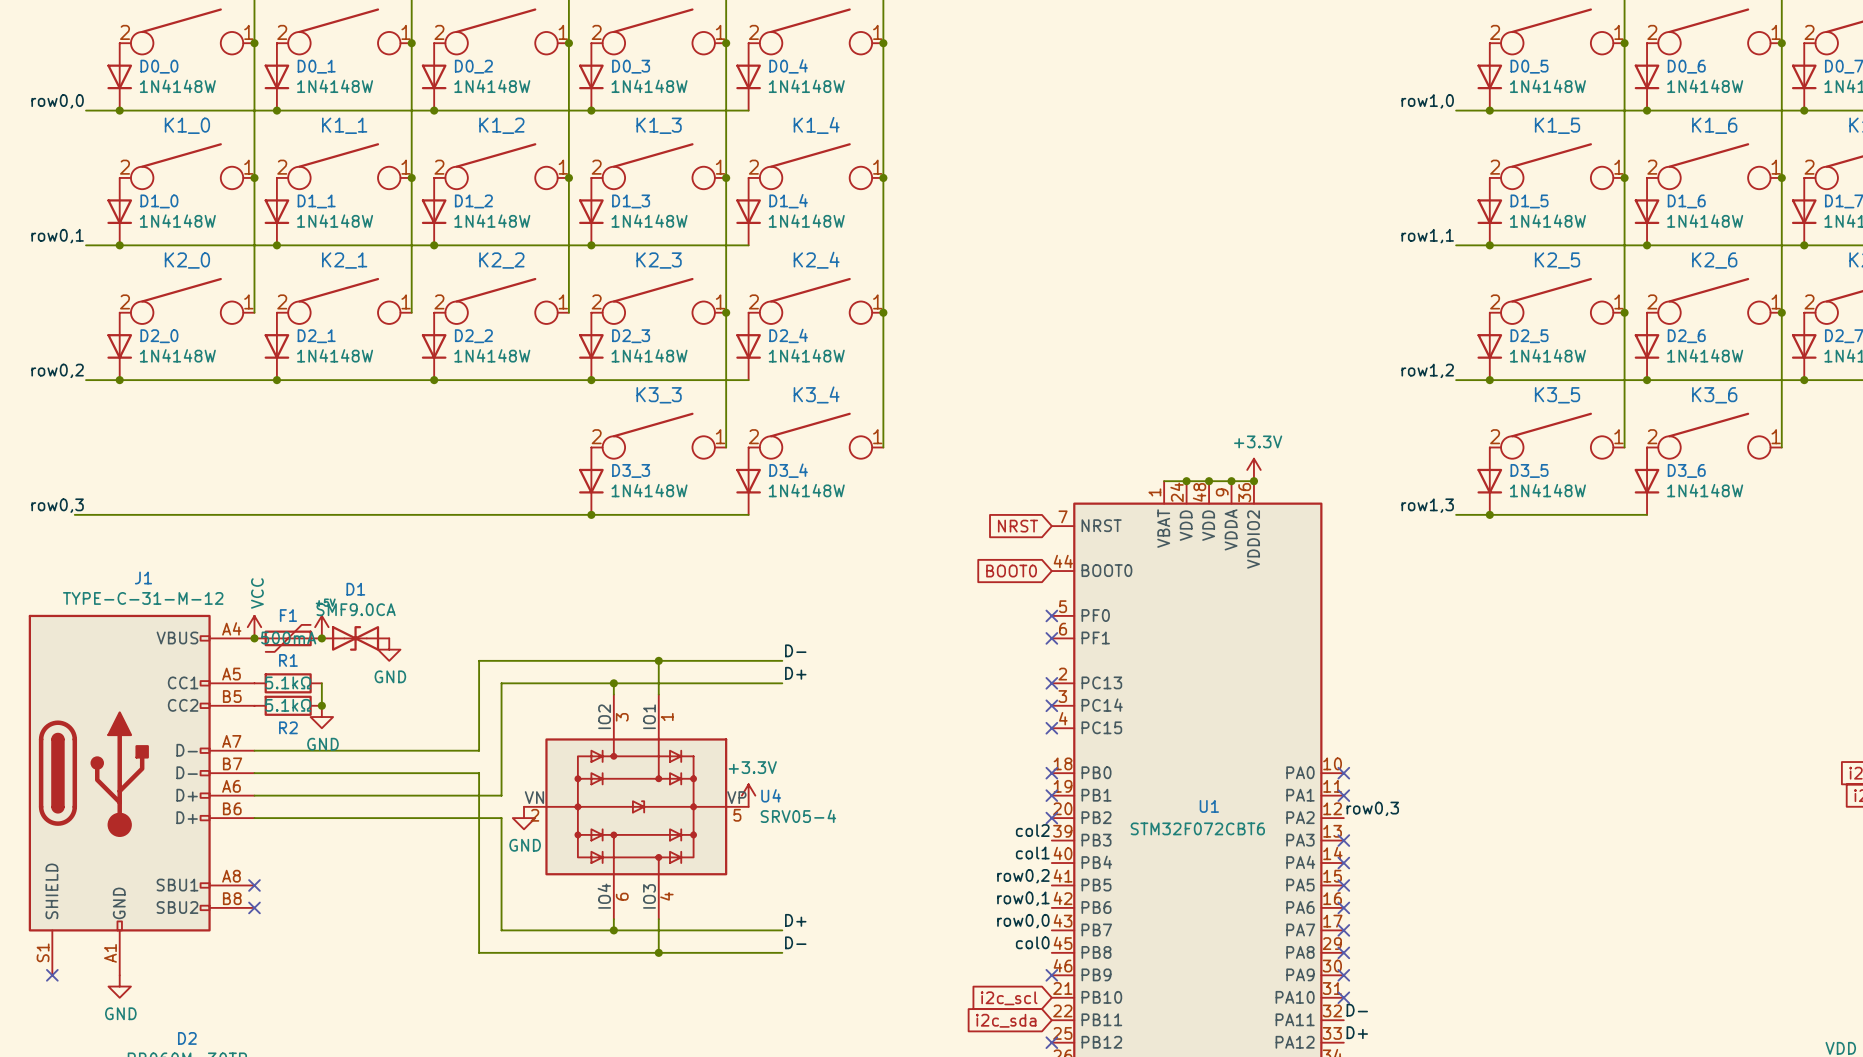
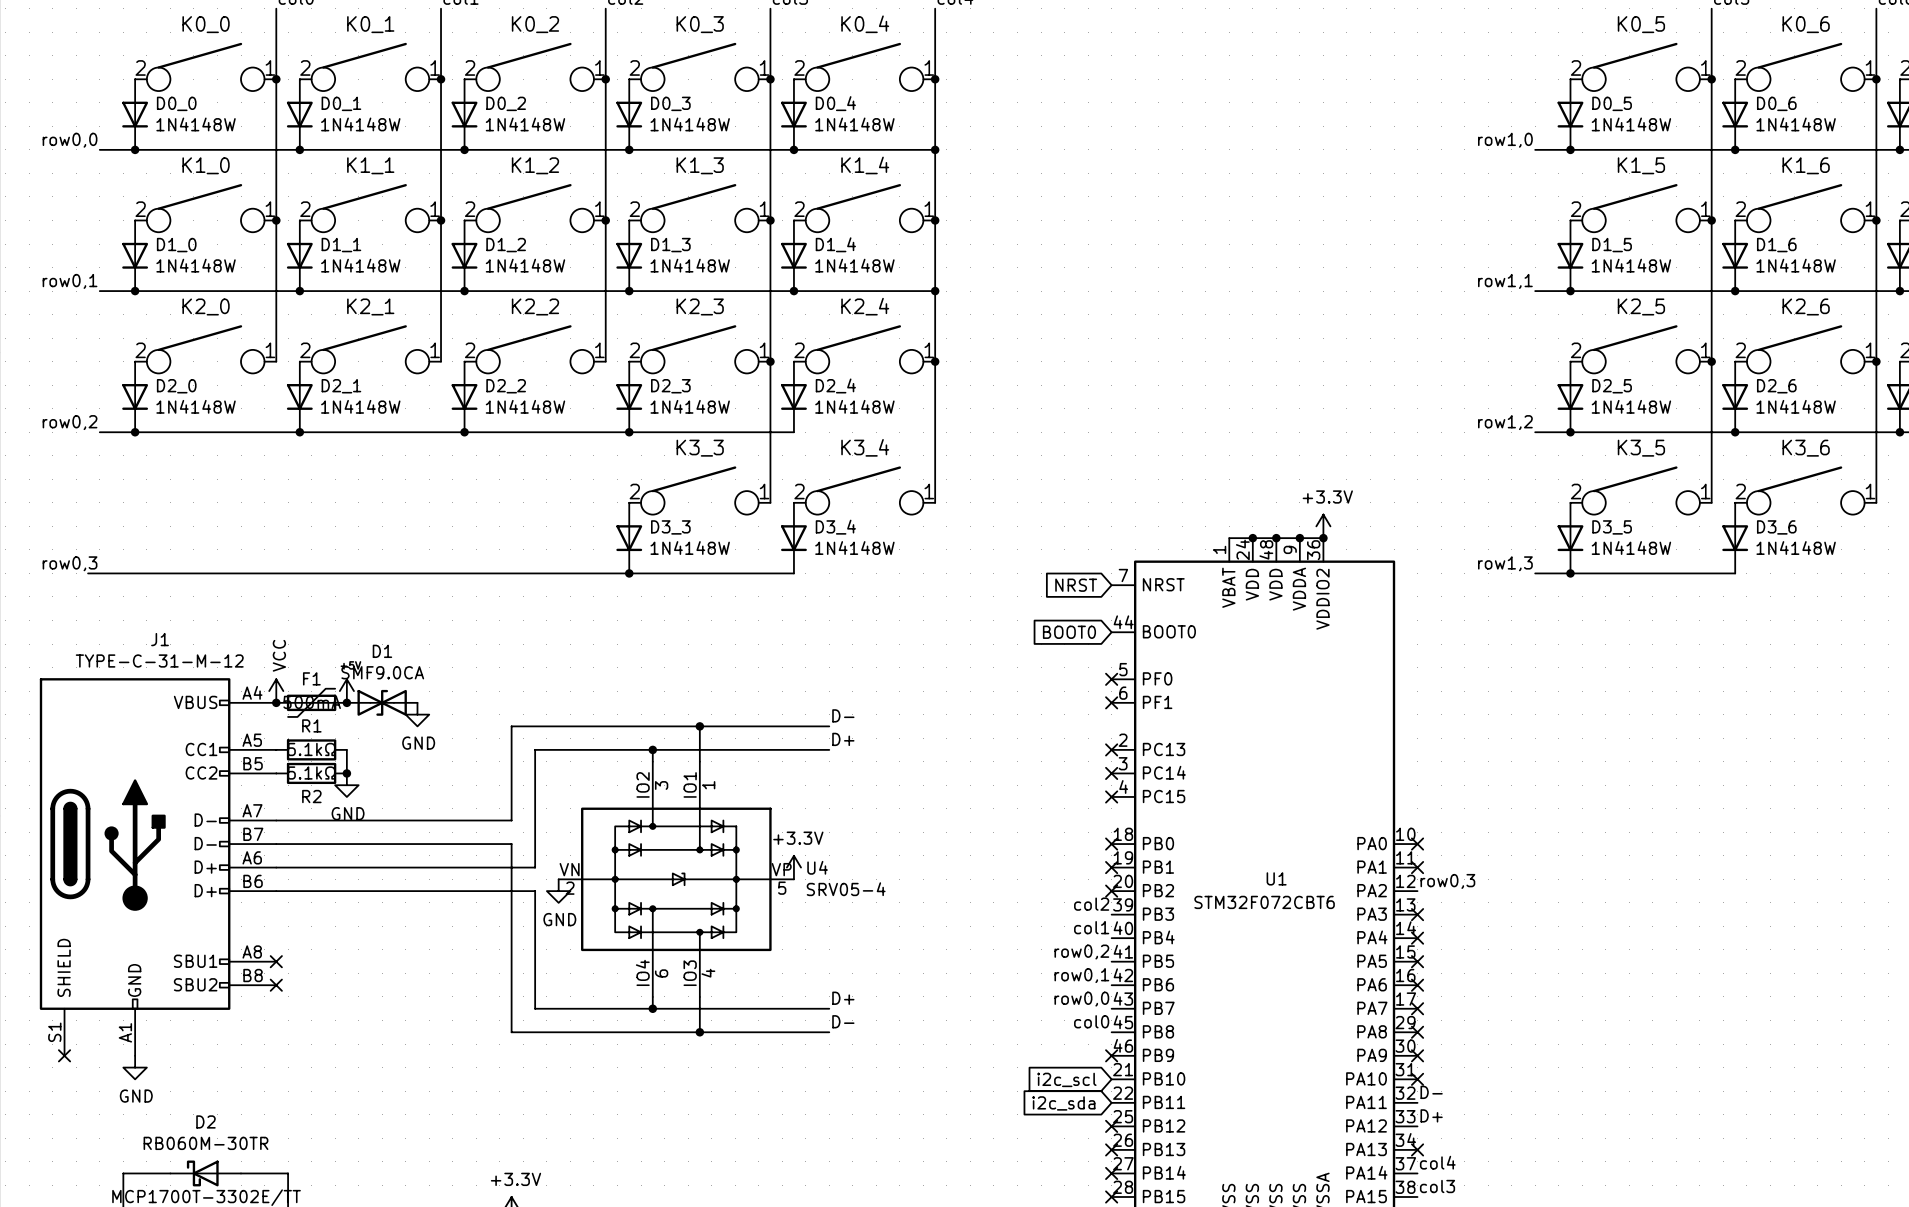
wire: none -> (793, 149) (935, 149)
junction: none -> (793, 149)
junction: none -> (935, 149)
wire: none -> (793, 291) (935, 291)
junction: none -> (793, 291)
junction: none -> (935, 291)

